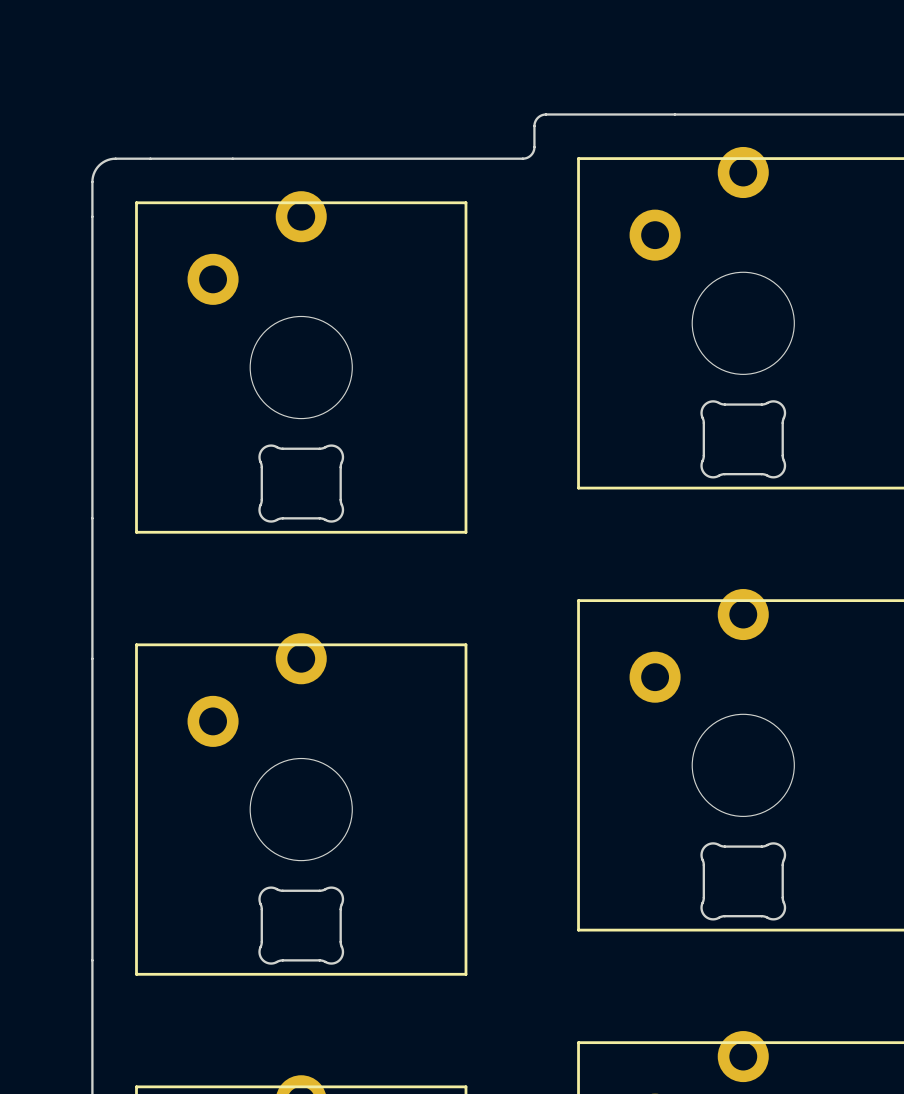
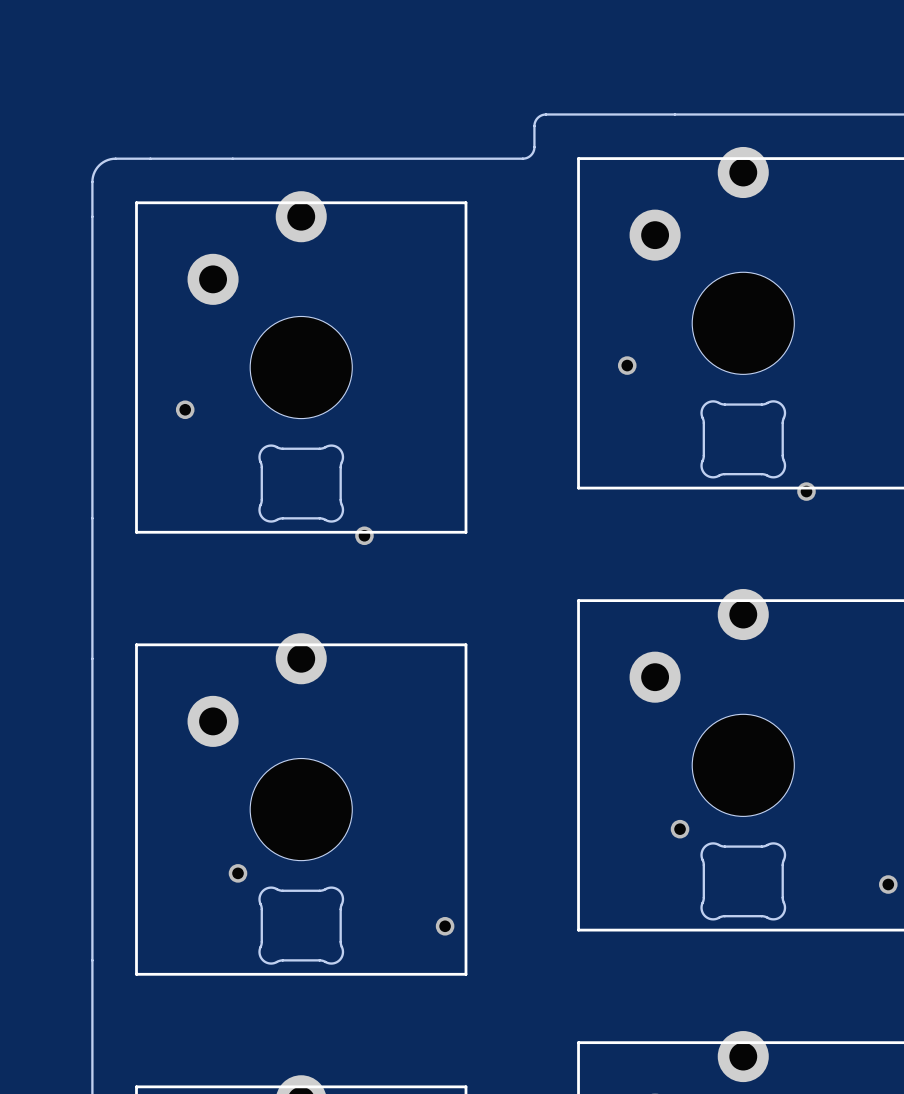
via: none -> (627, 365)
via: none -> (185, 409)
via: none -> (806, 491)
via: none -> (364, 535)
via: none -> (680, 829)
via: none -> (238, 873)
via: none -> (888, 884)
via: none -> (445, 926)

